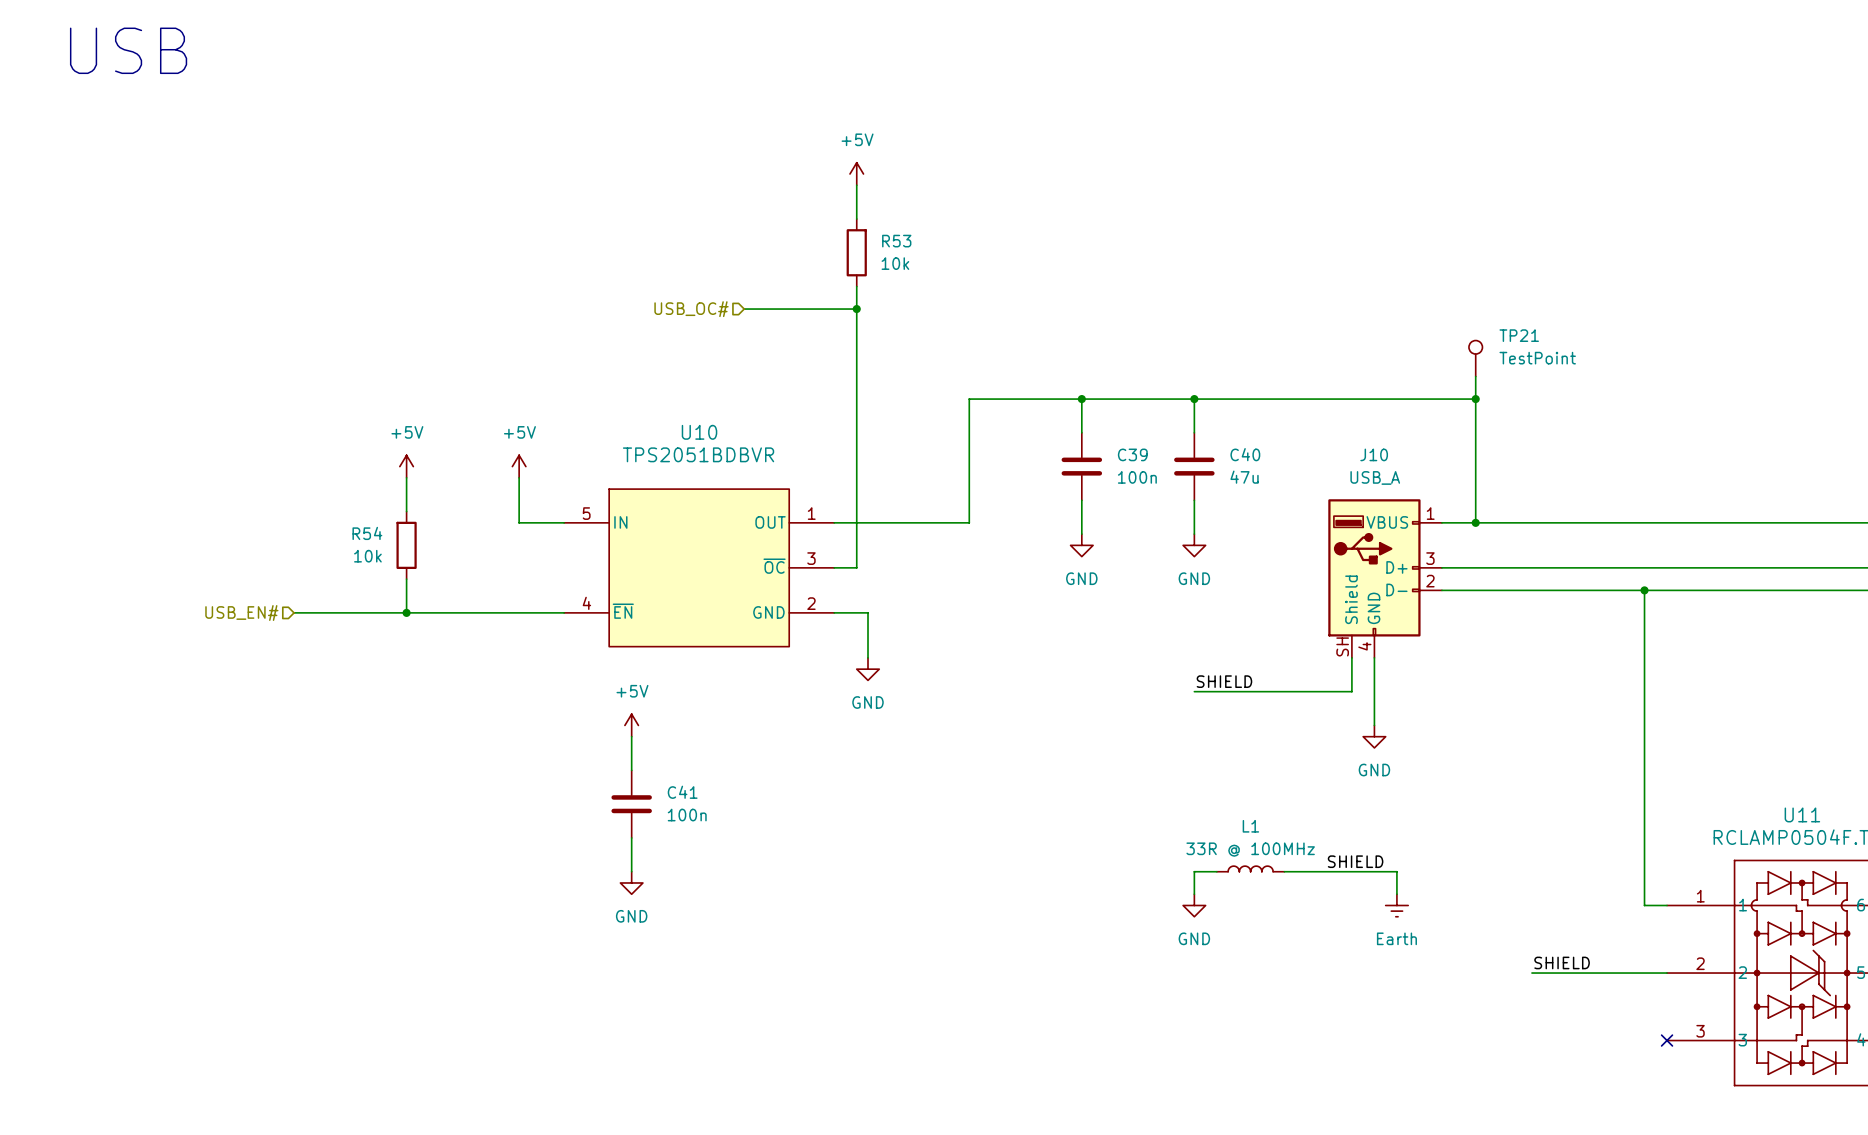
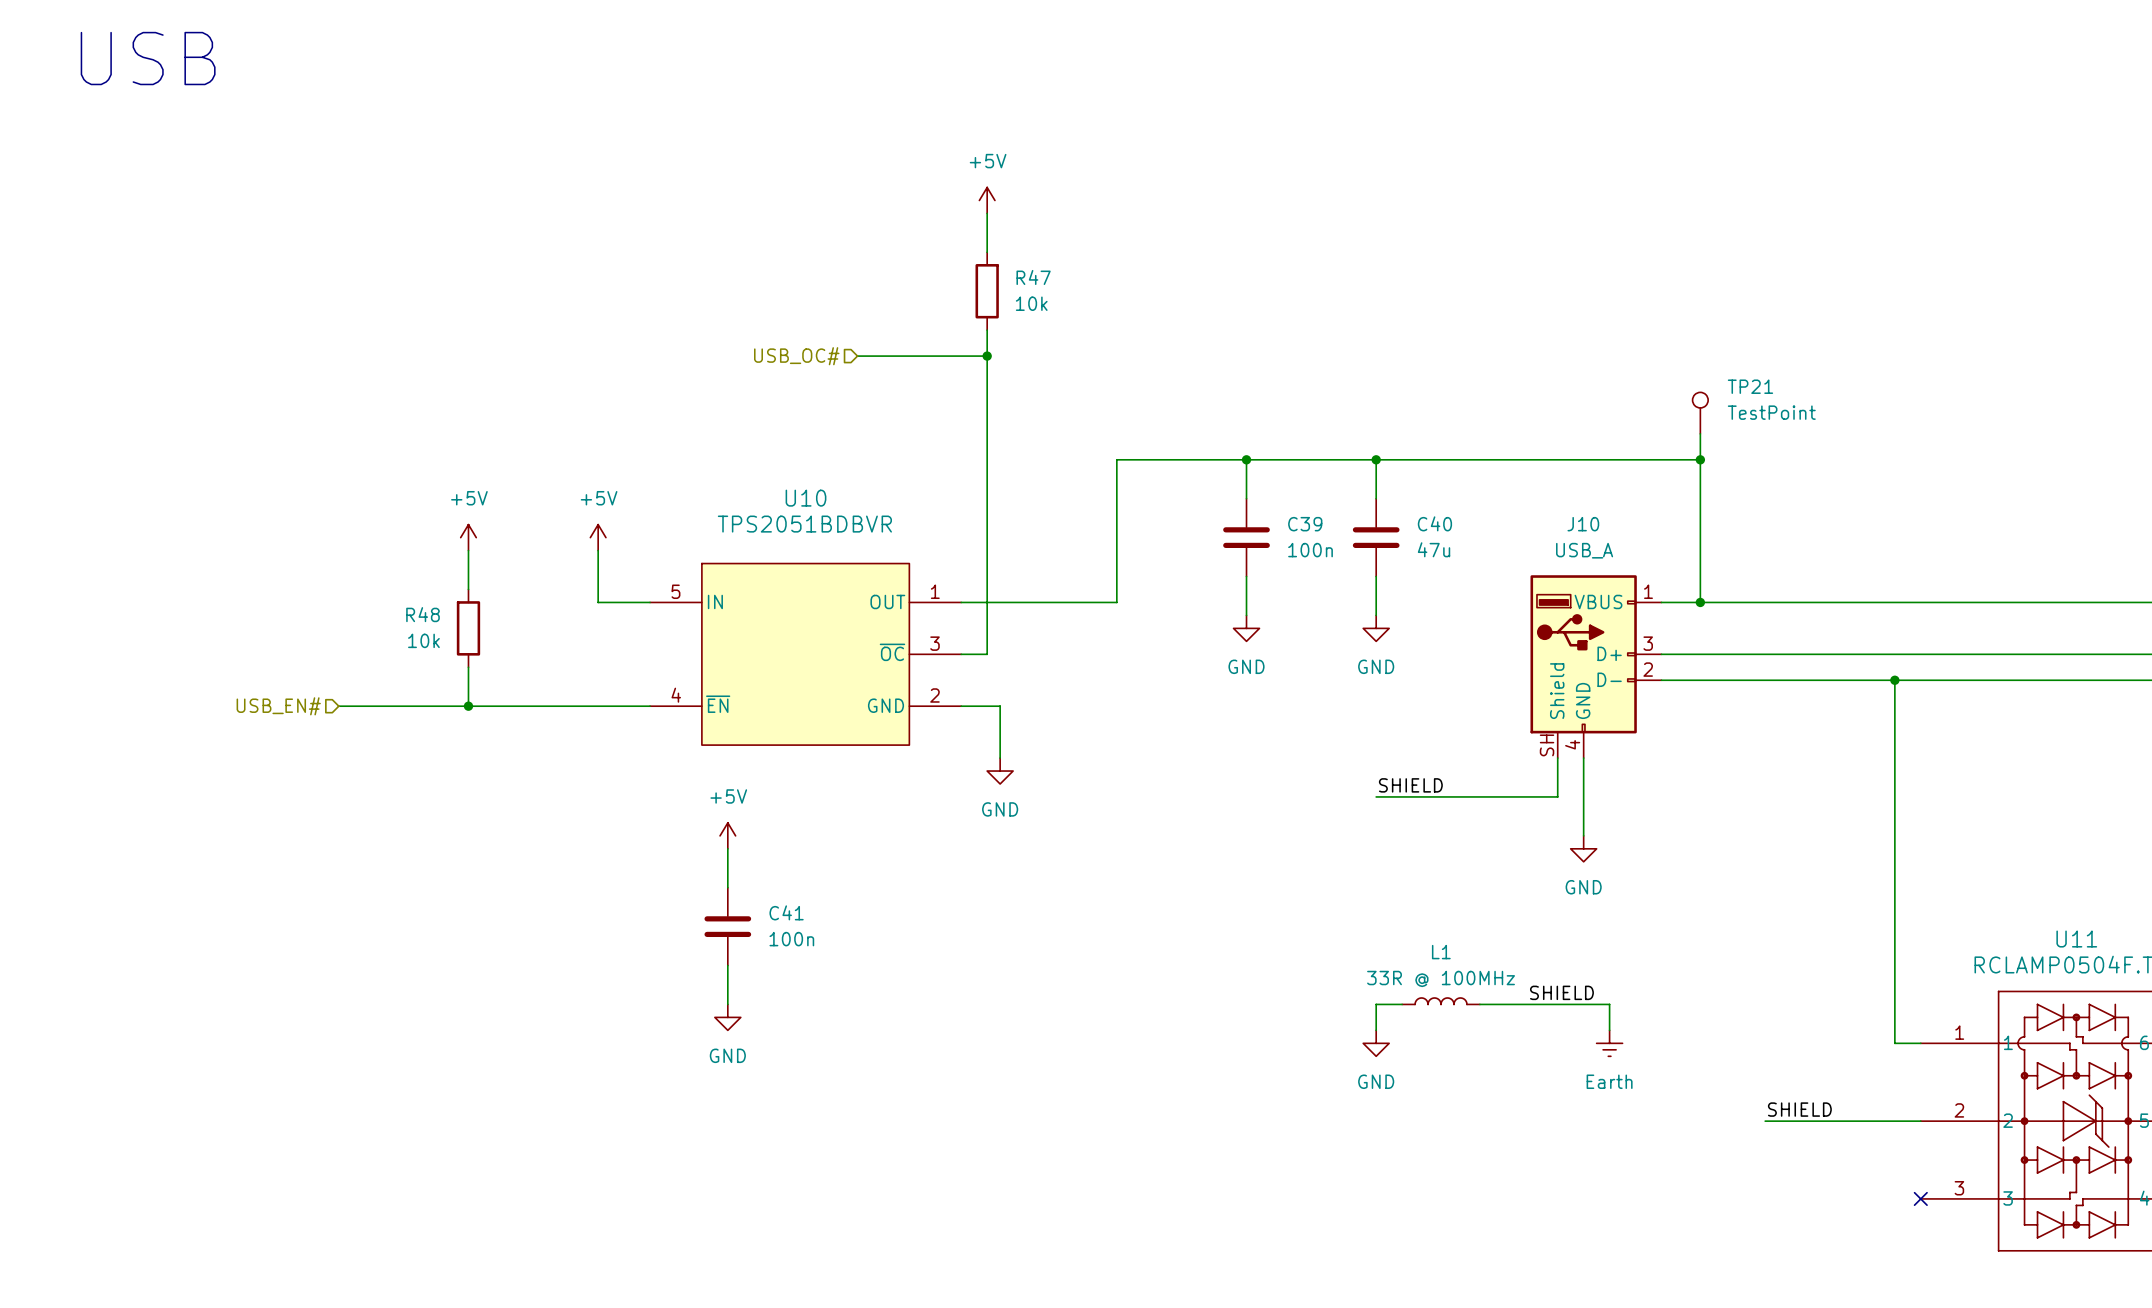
R53 name: R53 (896, 241) -> R47 (1033, 277)
R54 name: R54 (367, 533) -> R48 (423, 614)

